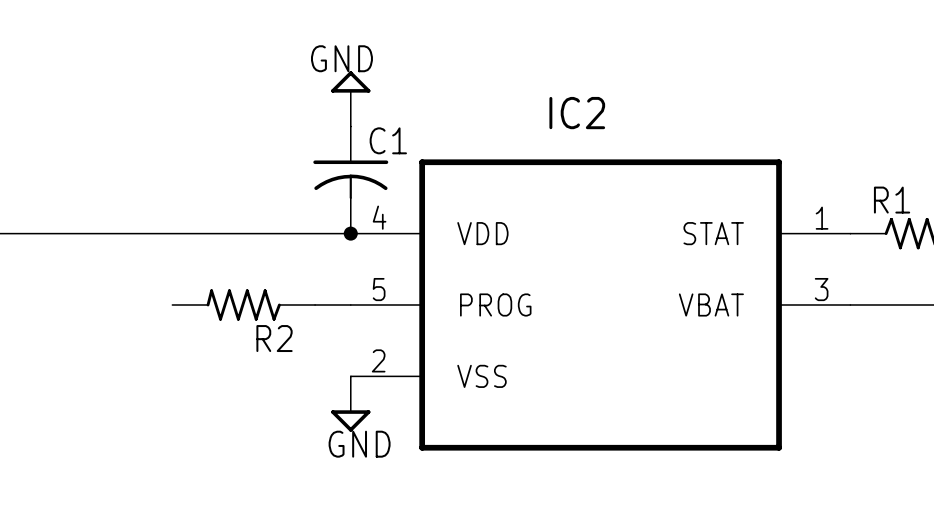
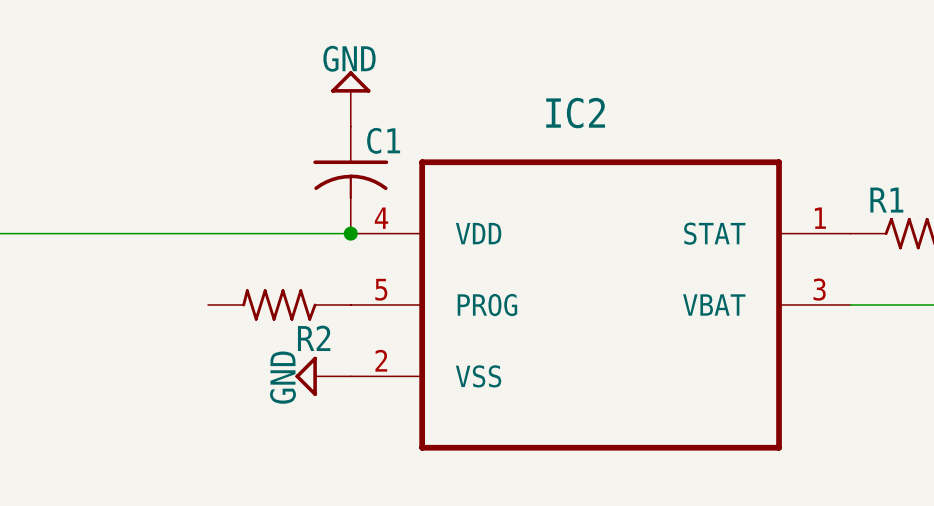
R2 position: (243, 304) -> (279, 304)
power symbol position: GND (350, 404) -> GND (323, 376)
power symbol rotation: 0° (350, 420) -> 90° clockwise (306, 376)

